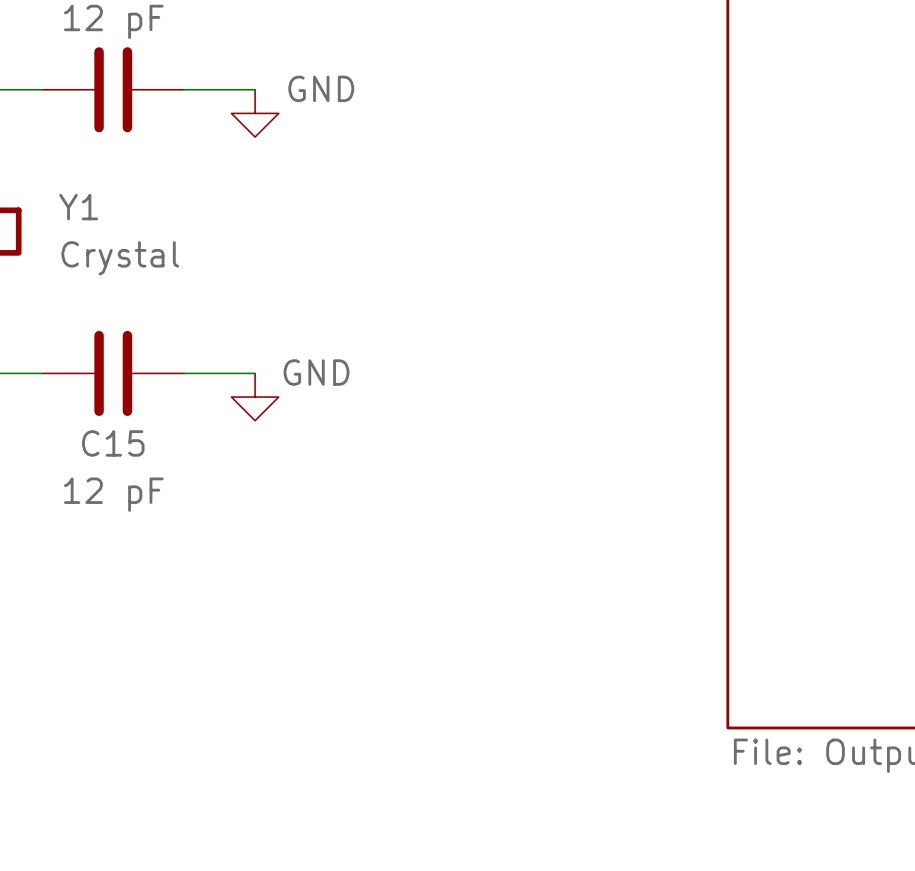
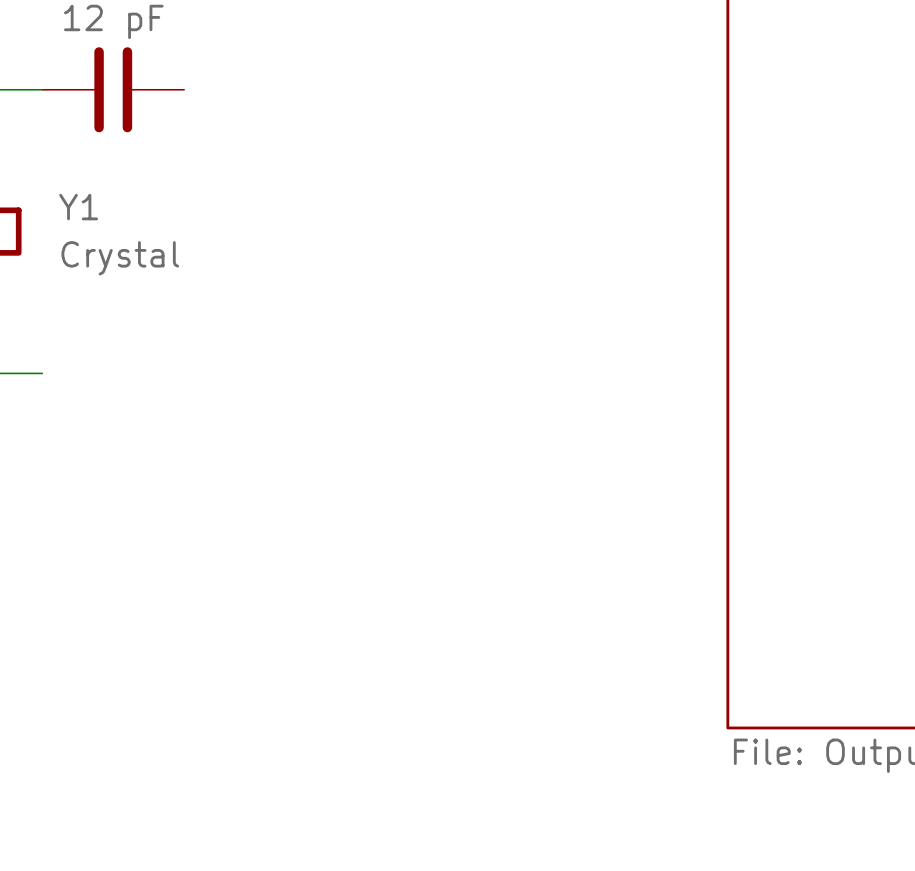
wire: (184, 89) (255, 89) -> none
power symbol: GND (255, 113) -> none
C15: 12 pF (113, 373) -> none
wire: (184, 373) (255, 373) -> none
power symbol: GND (255, 397) -> none

